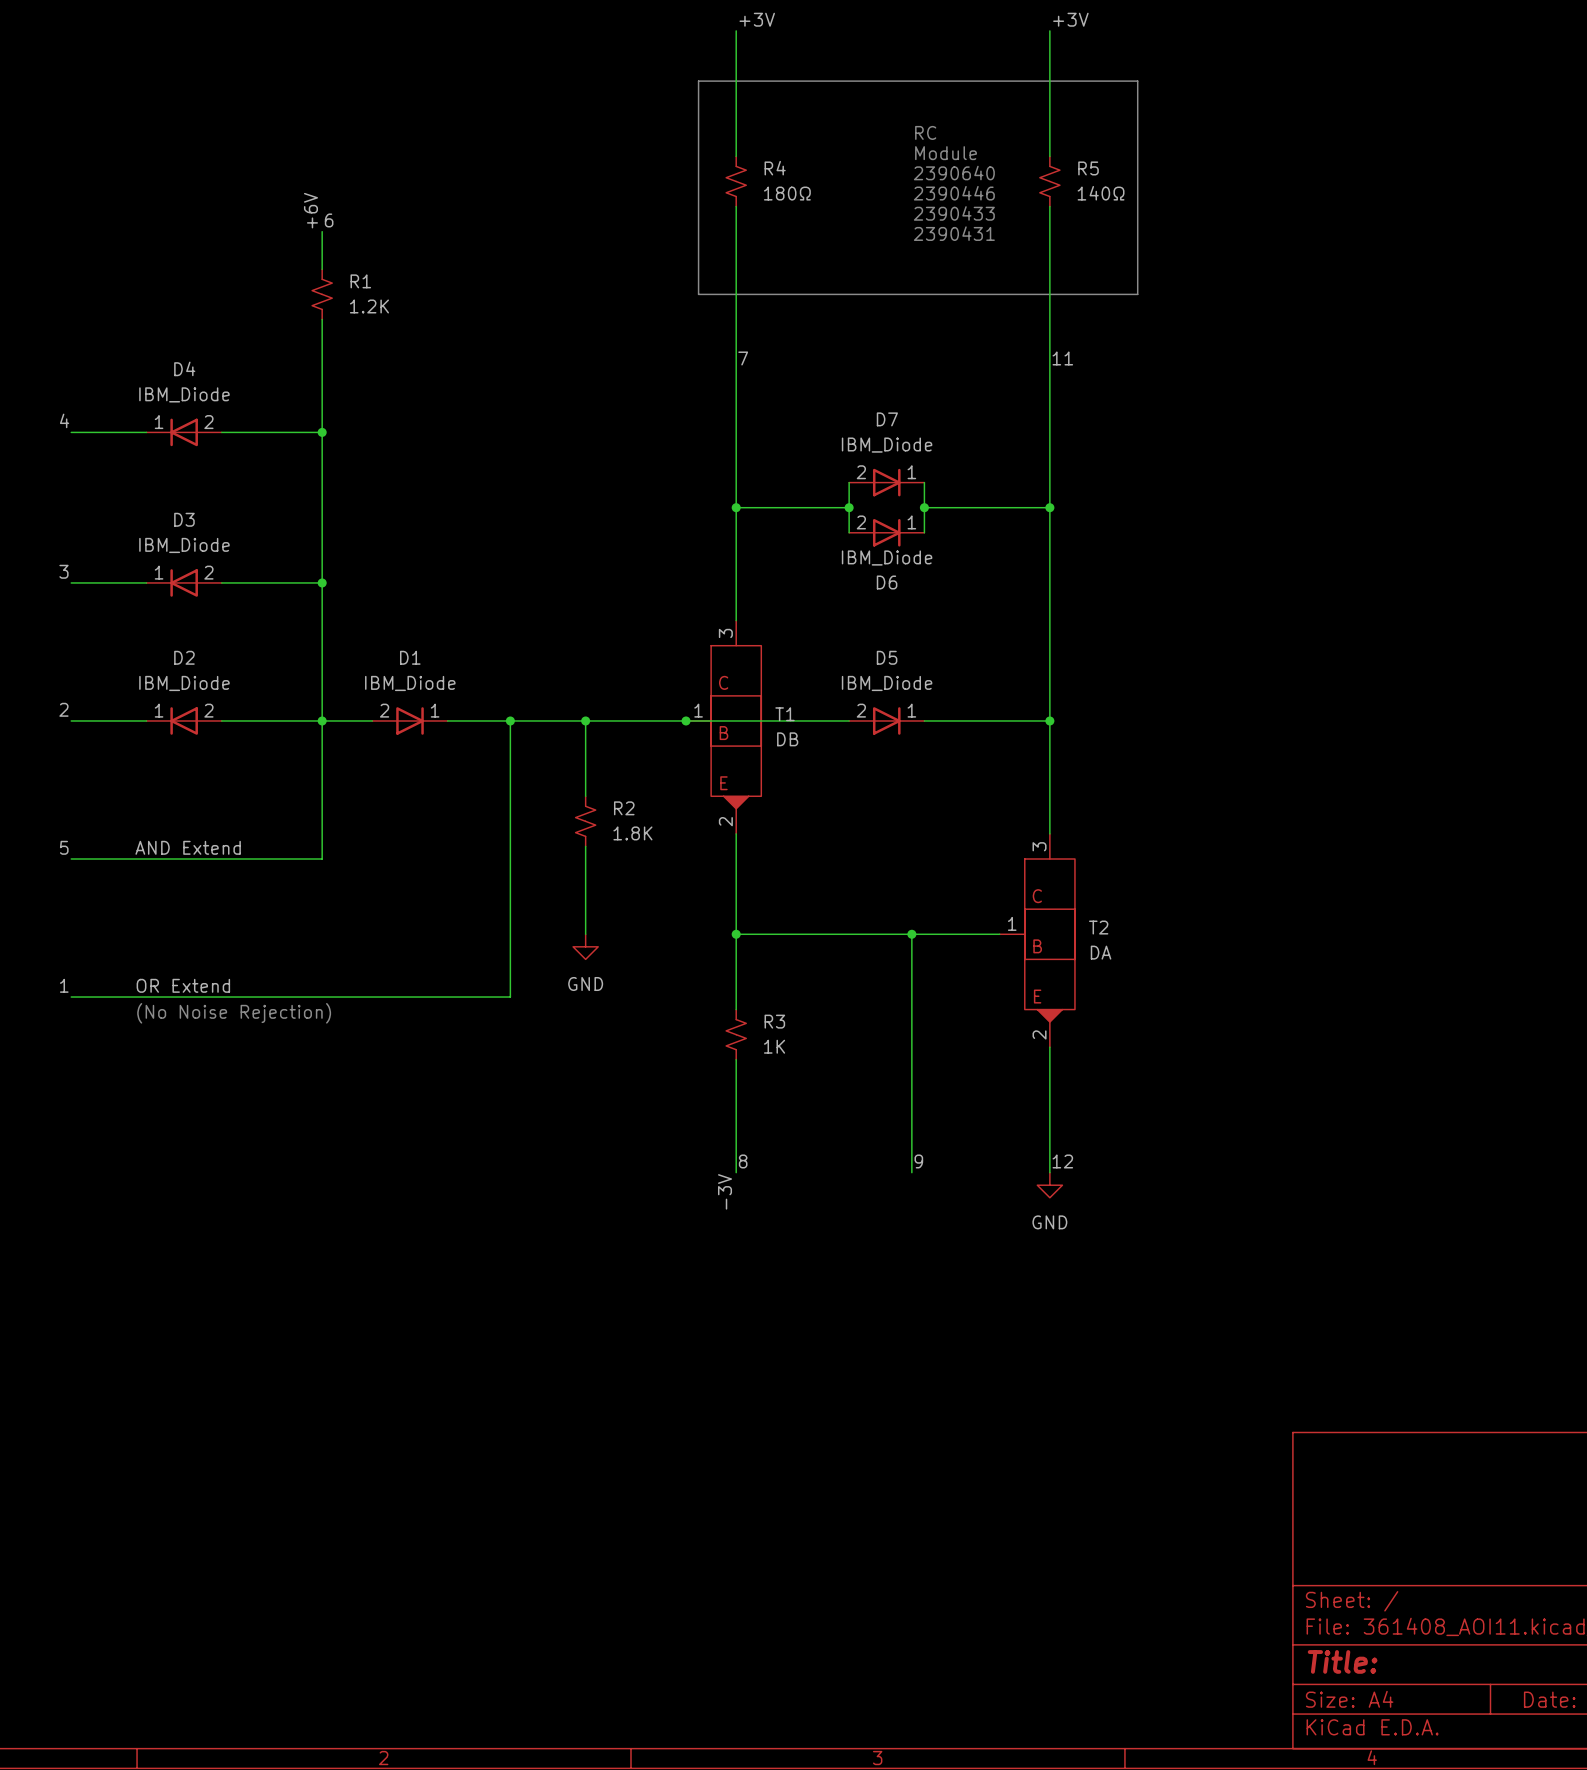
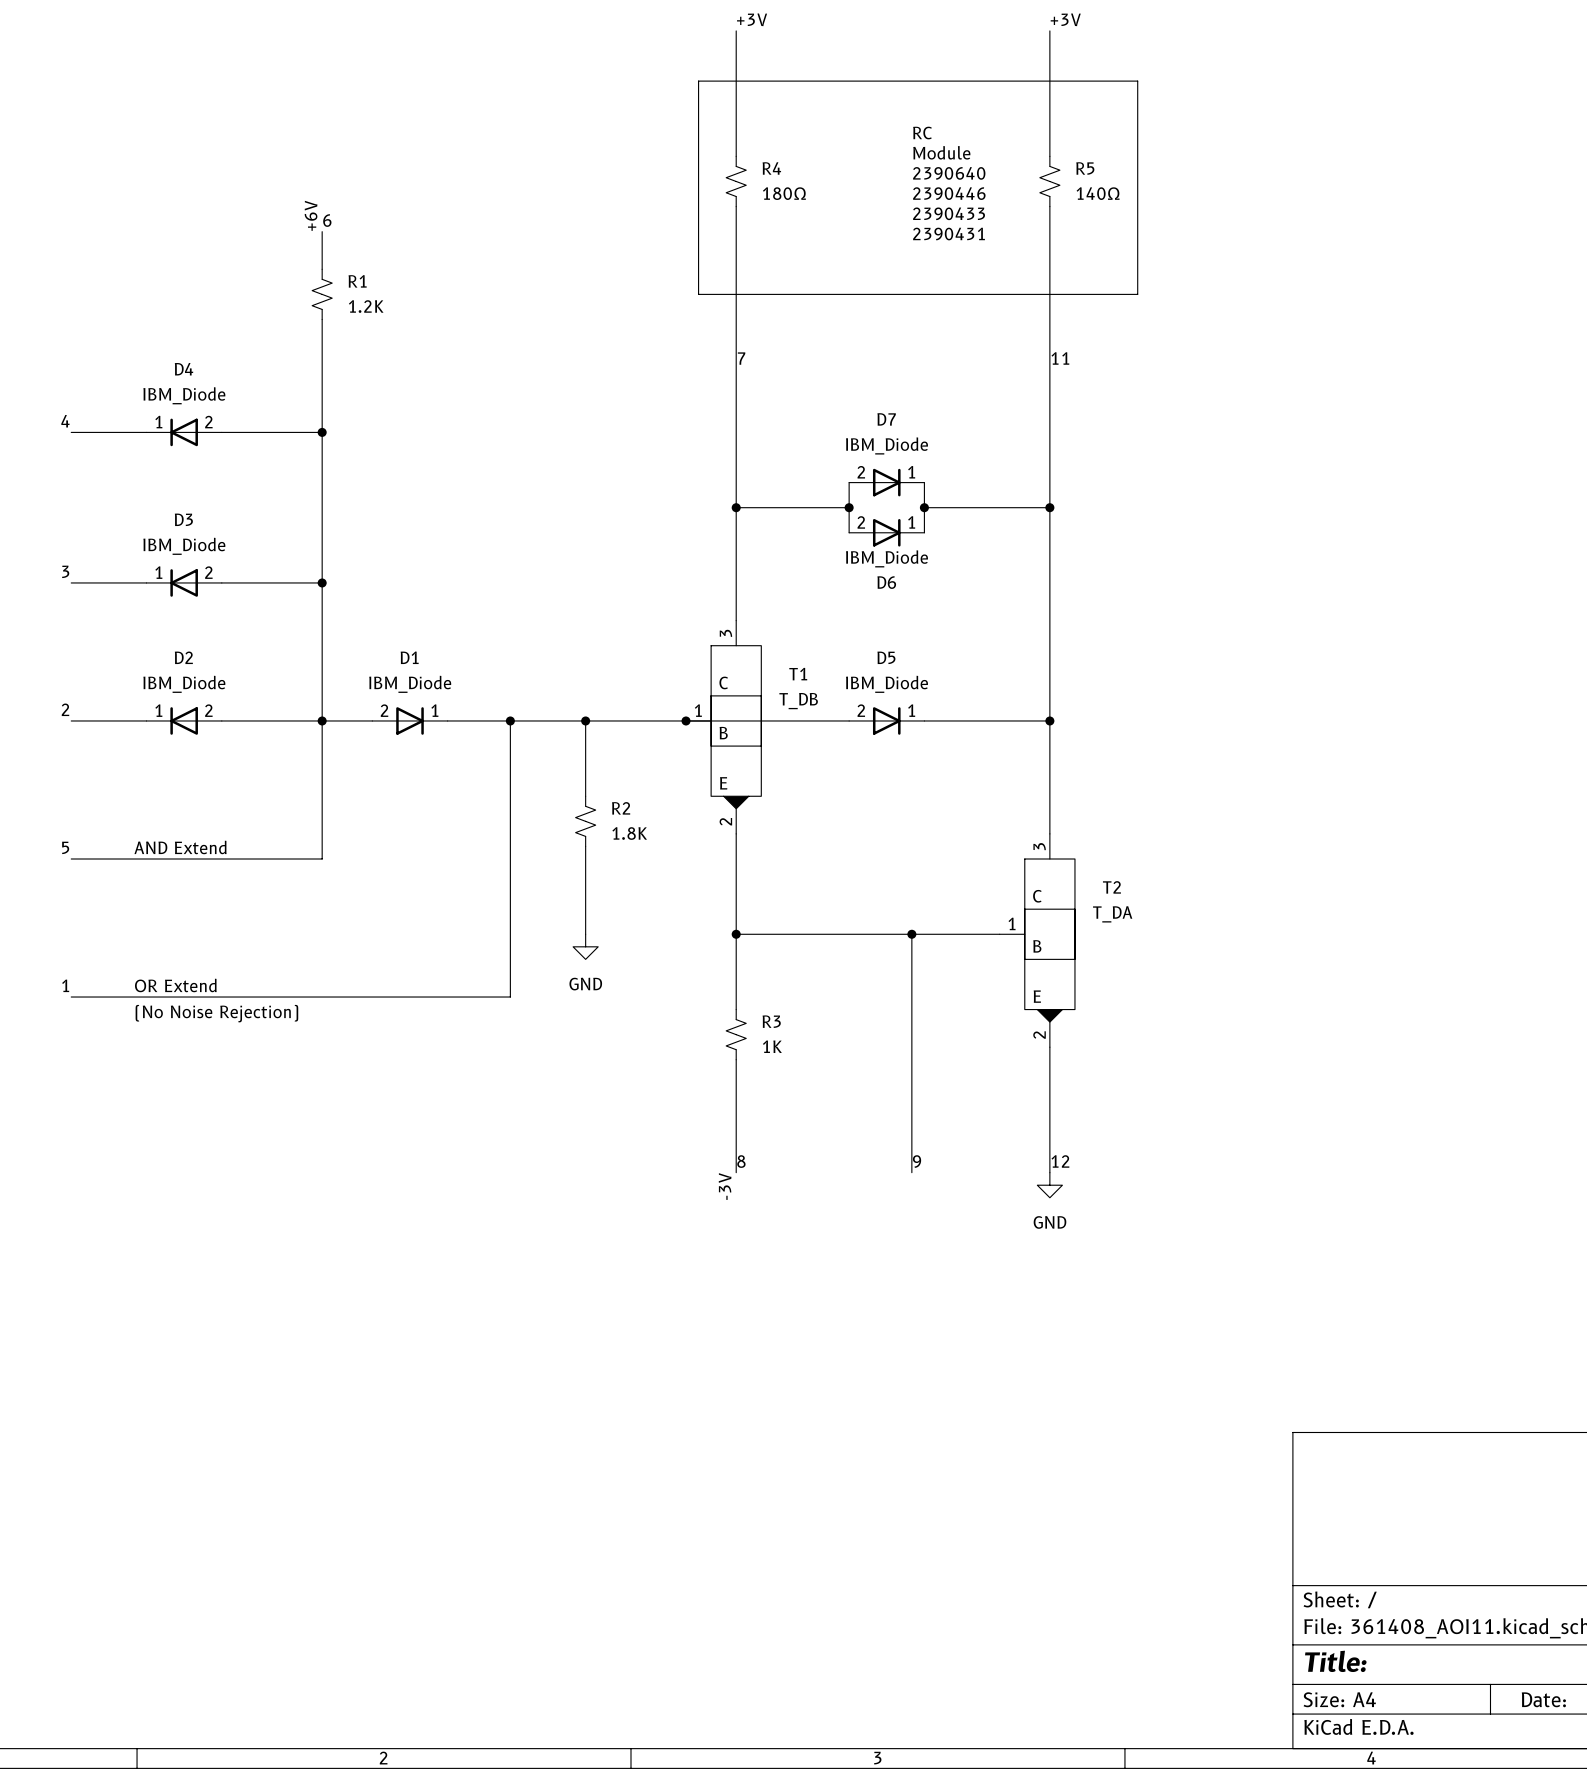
T1 name position: T1 (785, 714) -> T1 (798, 674)
T1 value: DB (787, 739) -> T_DB (798, 701)
T2 name position: T2 (1098, 927) -> T2 (1111, 887)
T2 value: DA (1101, 952) -> T_DA (1112, 914)

